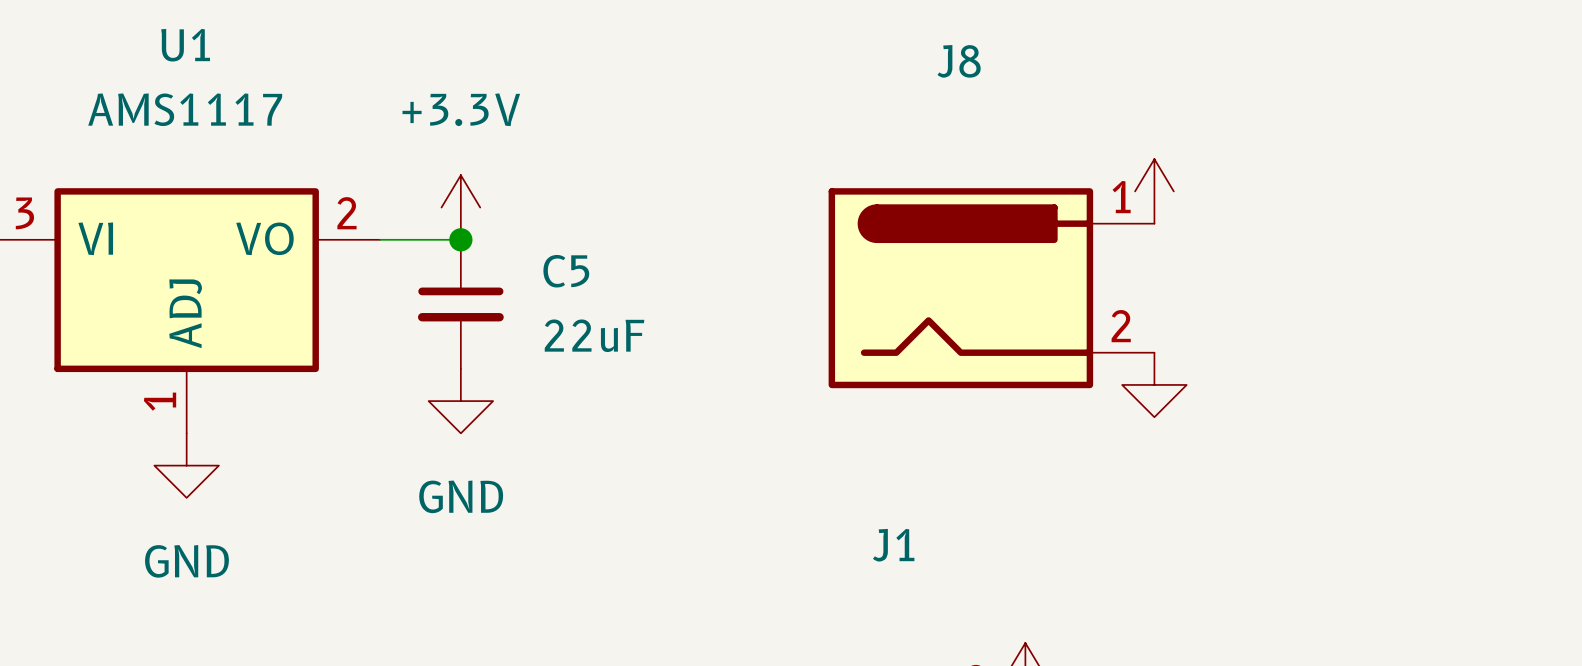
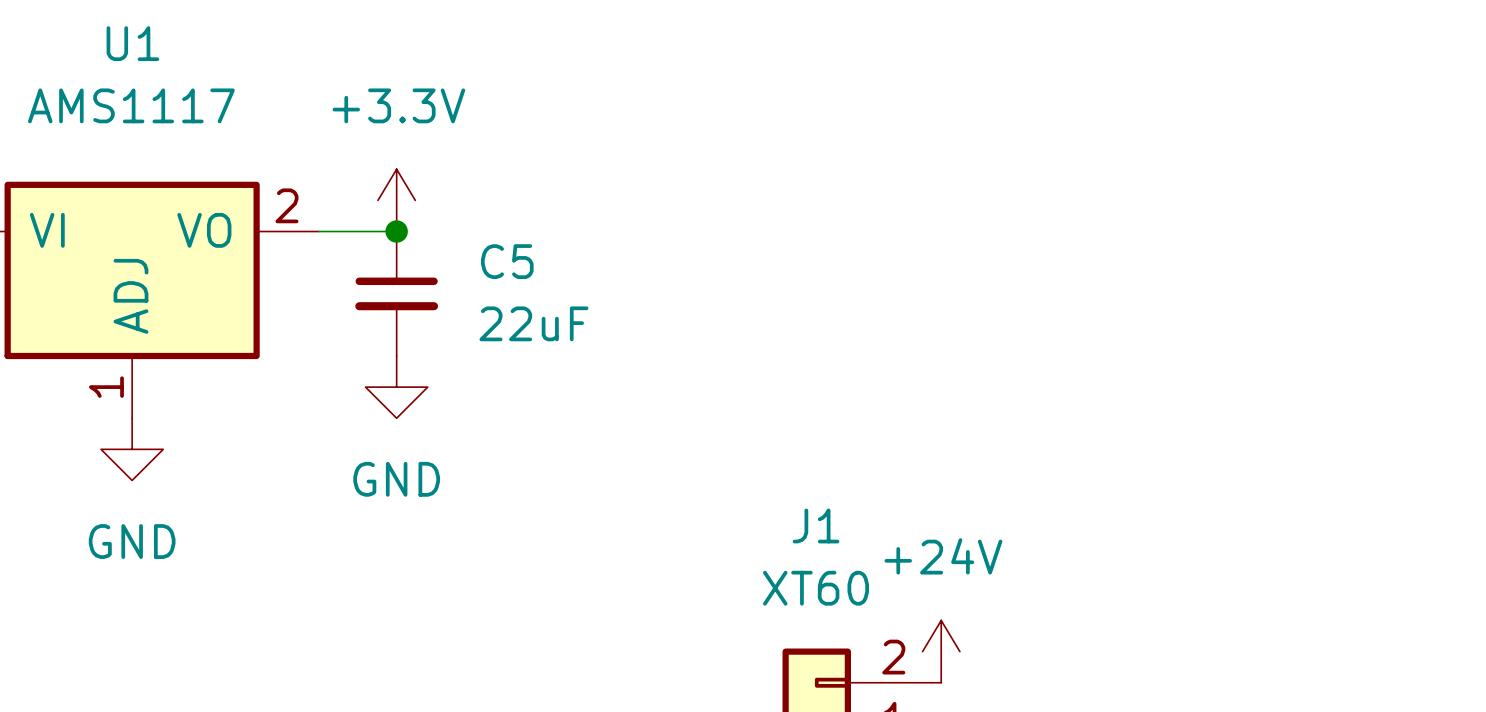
power symbol: (1154, 191) -> none
J8: (991, 288) -> none
power symbol: (1154, 384) -> none
power symbol text: none -> +24V (943, 556)
J1 value: none -> XT60 (816, 588)

